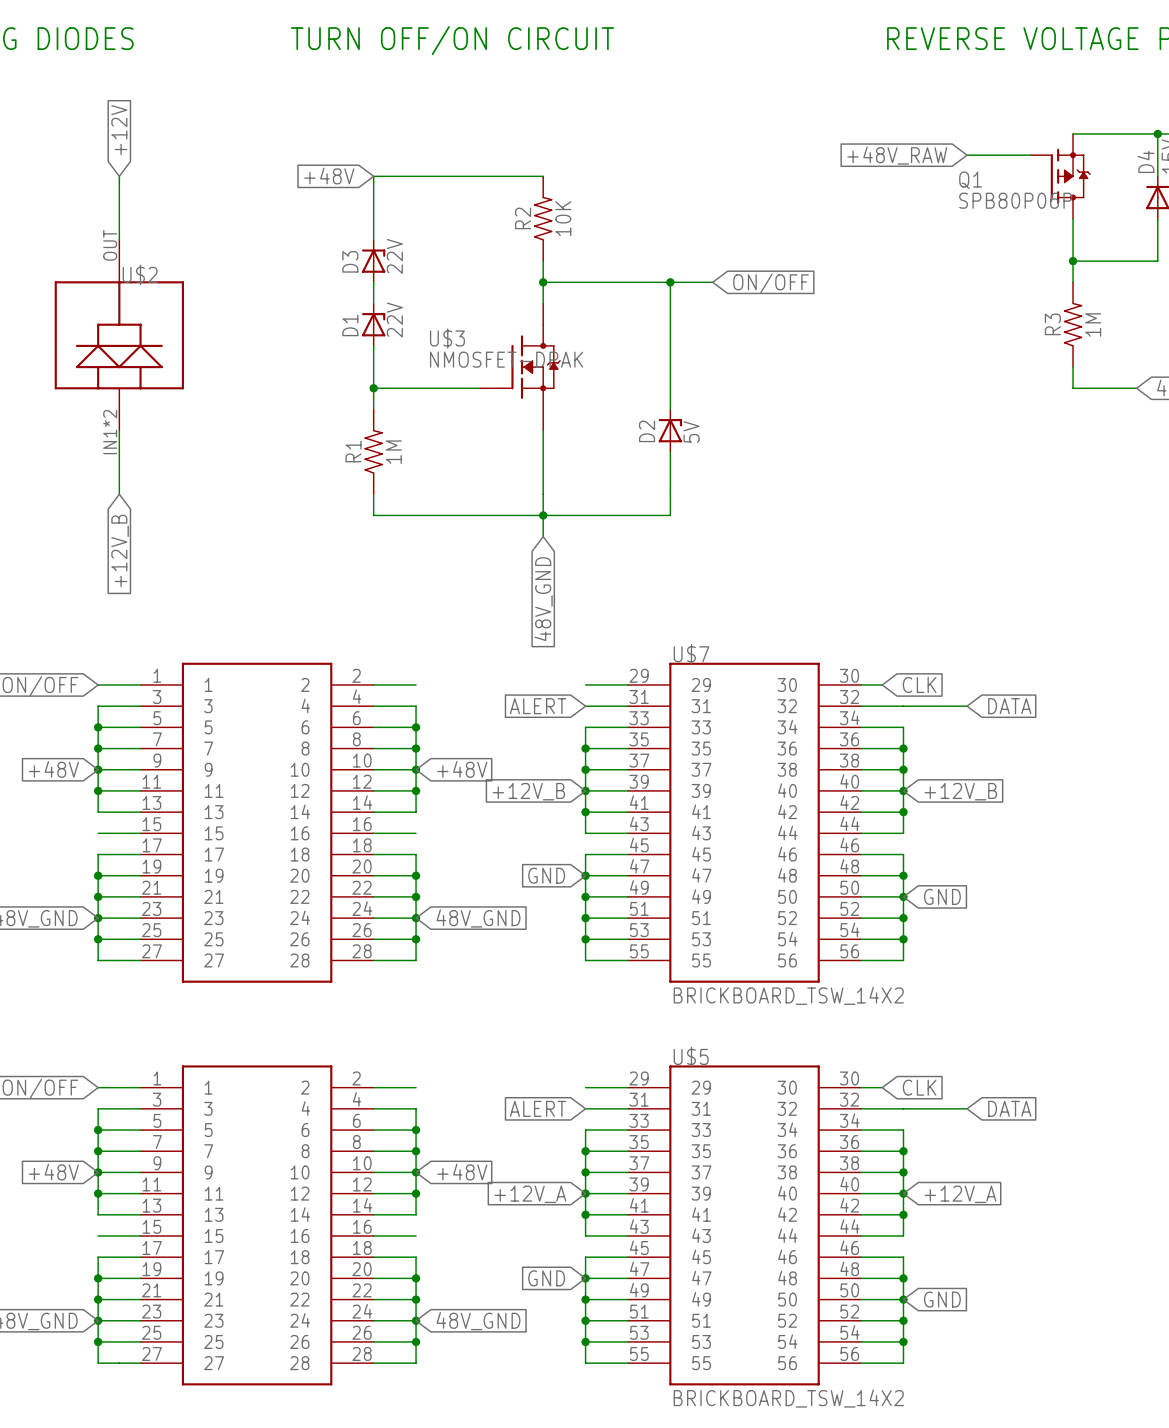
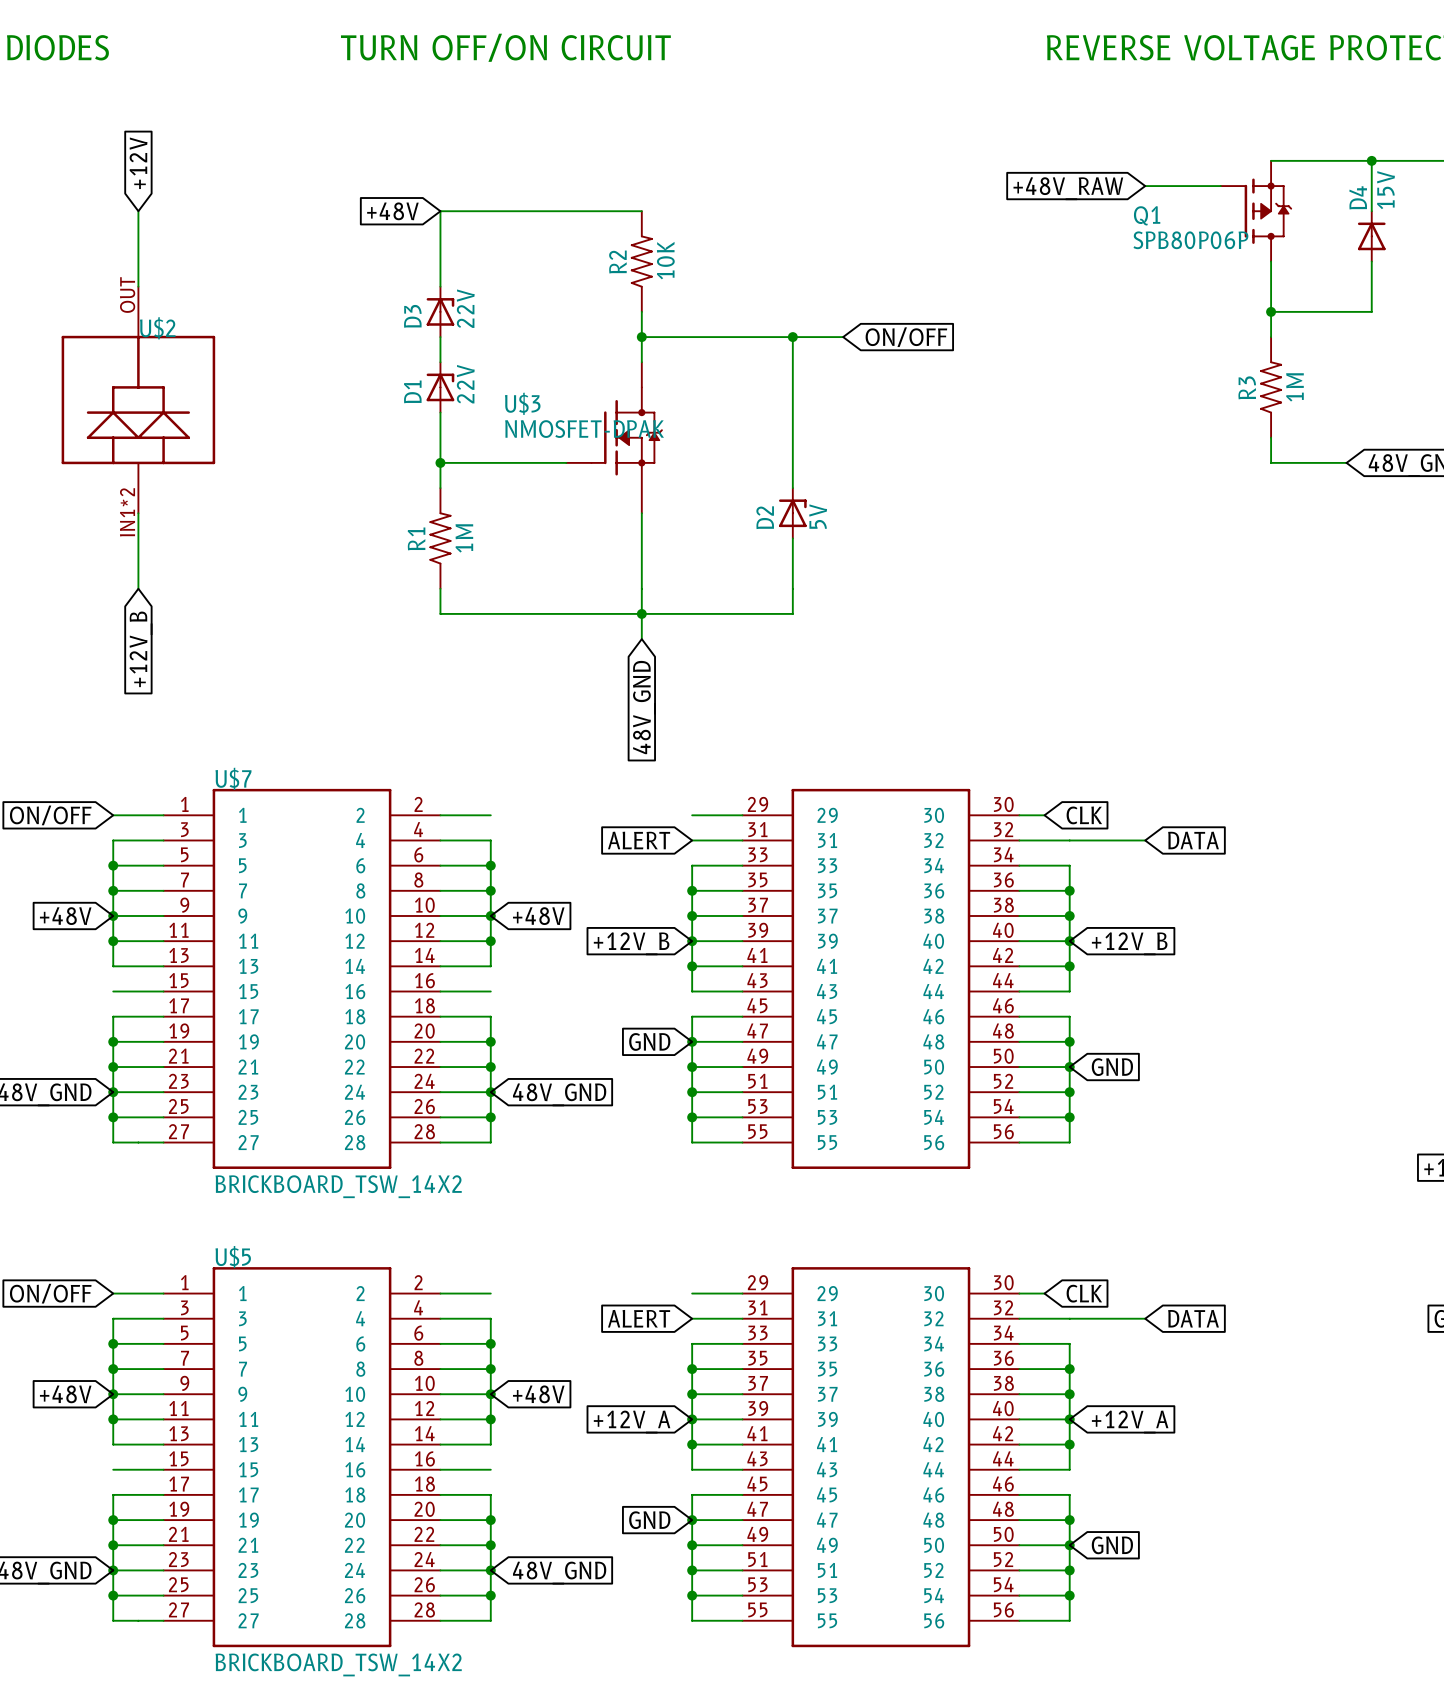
U$7 name position: U$7 (691, 654) -> U$7 (233, 778)
U$7 value position: BRICKBOARD_TSW_14X2 (788, 995) -> BRICKBOARD_TSW_14X2 (338, 1186)
U$5 name position: U$5 (691, 1056) -> U$5 (233, 1257)
U$5 value position: BRICKBOARD_TSW_14X2 (788, 1398) -> BRICKBOARD_TSW_14X2 (338, 1664)

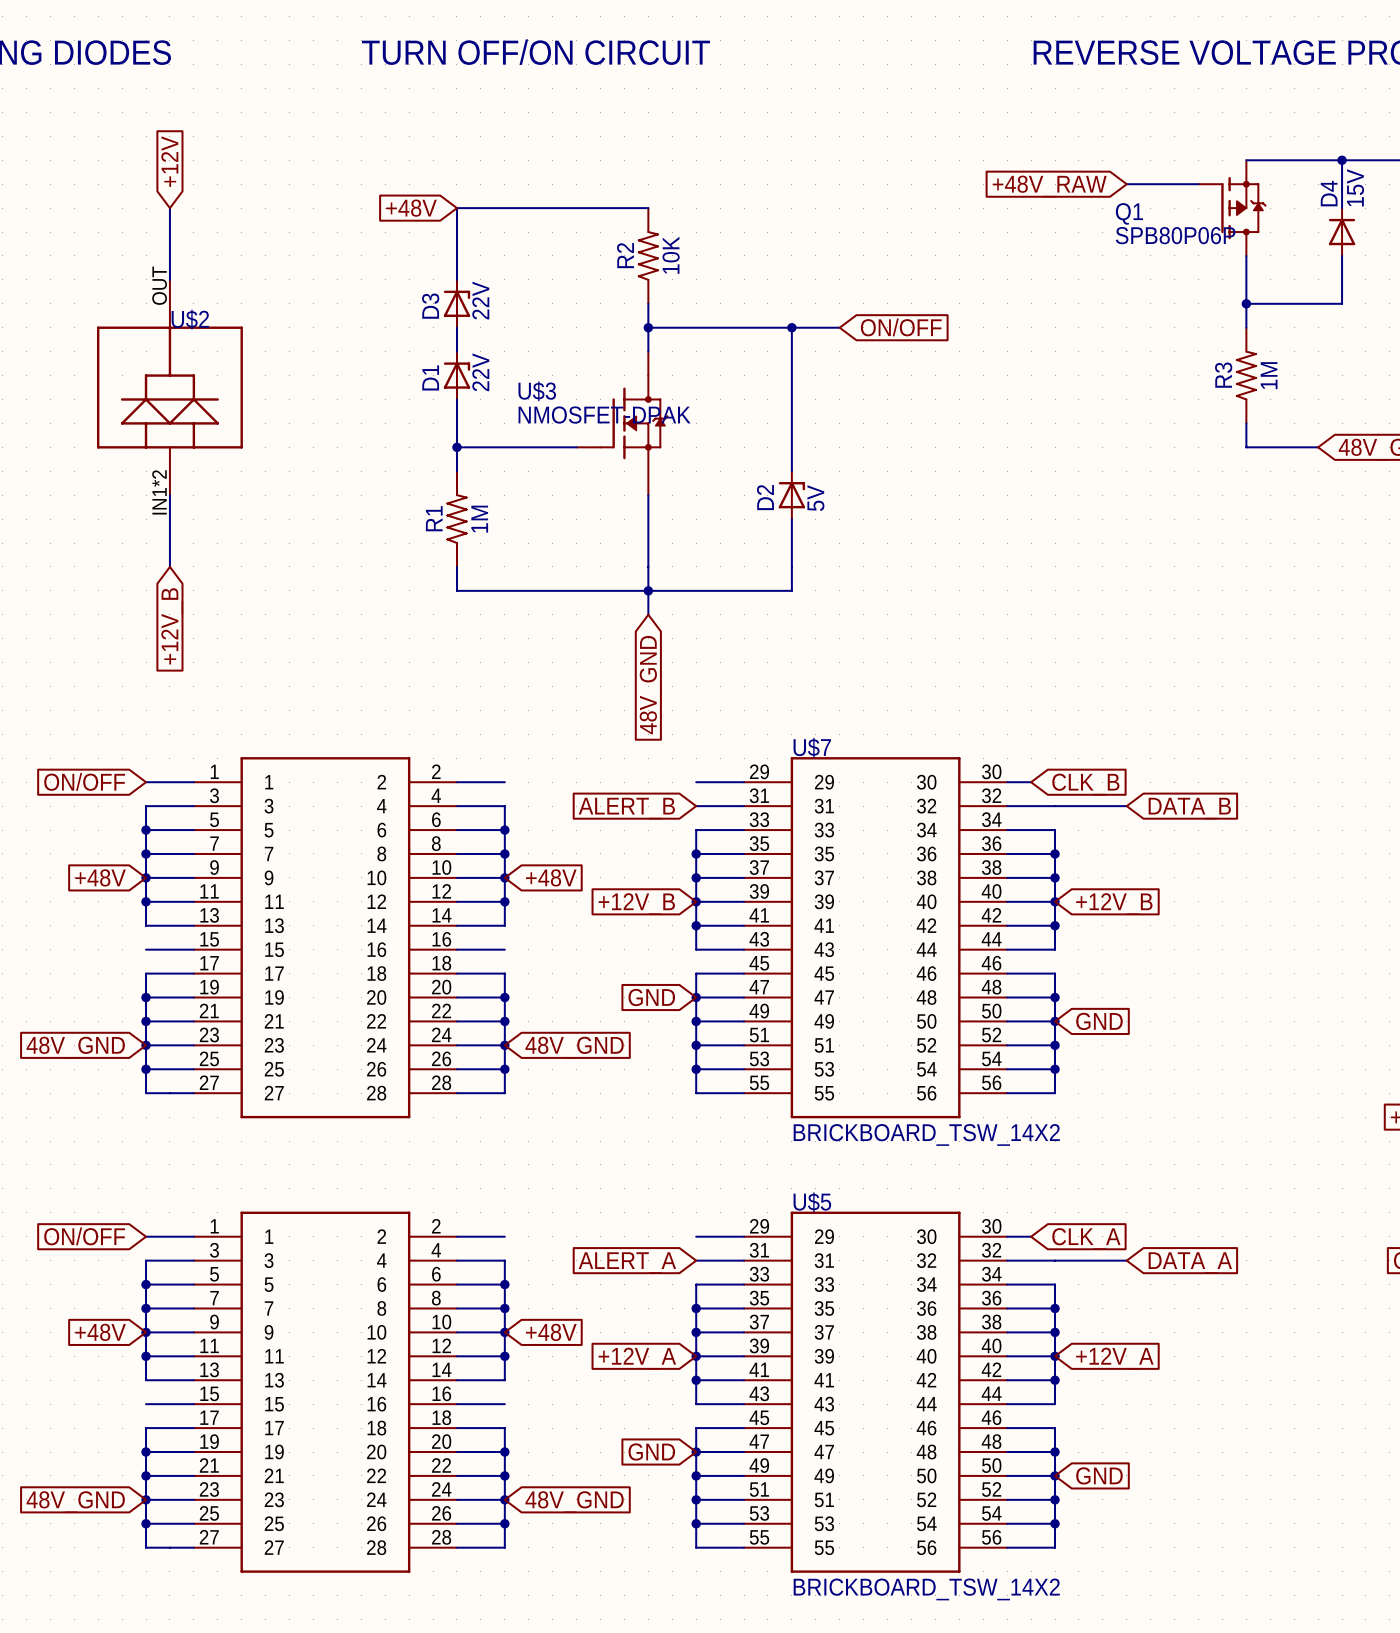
U$7 name position: U$7 (233, 778) -> U$7 (812, 747)
global label: CLK (1084, 815) -> CLK_B (1085, 784)
global label: ALERT (639, 840) -> ALERT_B (626, 808)
global label: DATA (1193, 840) -> DATA_B (1189, 808)
U$7 value position: BRICKBOARD_TSW_14X2 (338, 1186) -> BRICKBOARD_TSW_14X2 (926, 1134)
U$5 name position: U$5 (233, 1257) -> U$5 (812, 1202)
global label: CLK (1084, 1293) -> CLK_A (1086, 1239)
global label: ALERT (639, 1318) -> ALERT_A (627, 1263)
global label: DATA (1193, 1318) -> DATA_A (1190, 1263)
U$5 value position: BRICKBOARD_TSW_14X2 (338, 1664) -> BRICKBOARD_TSW_14X2 (926, 1589)

